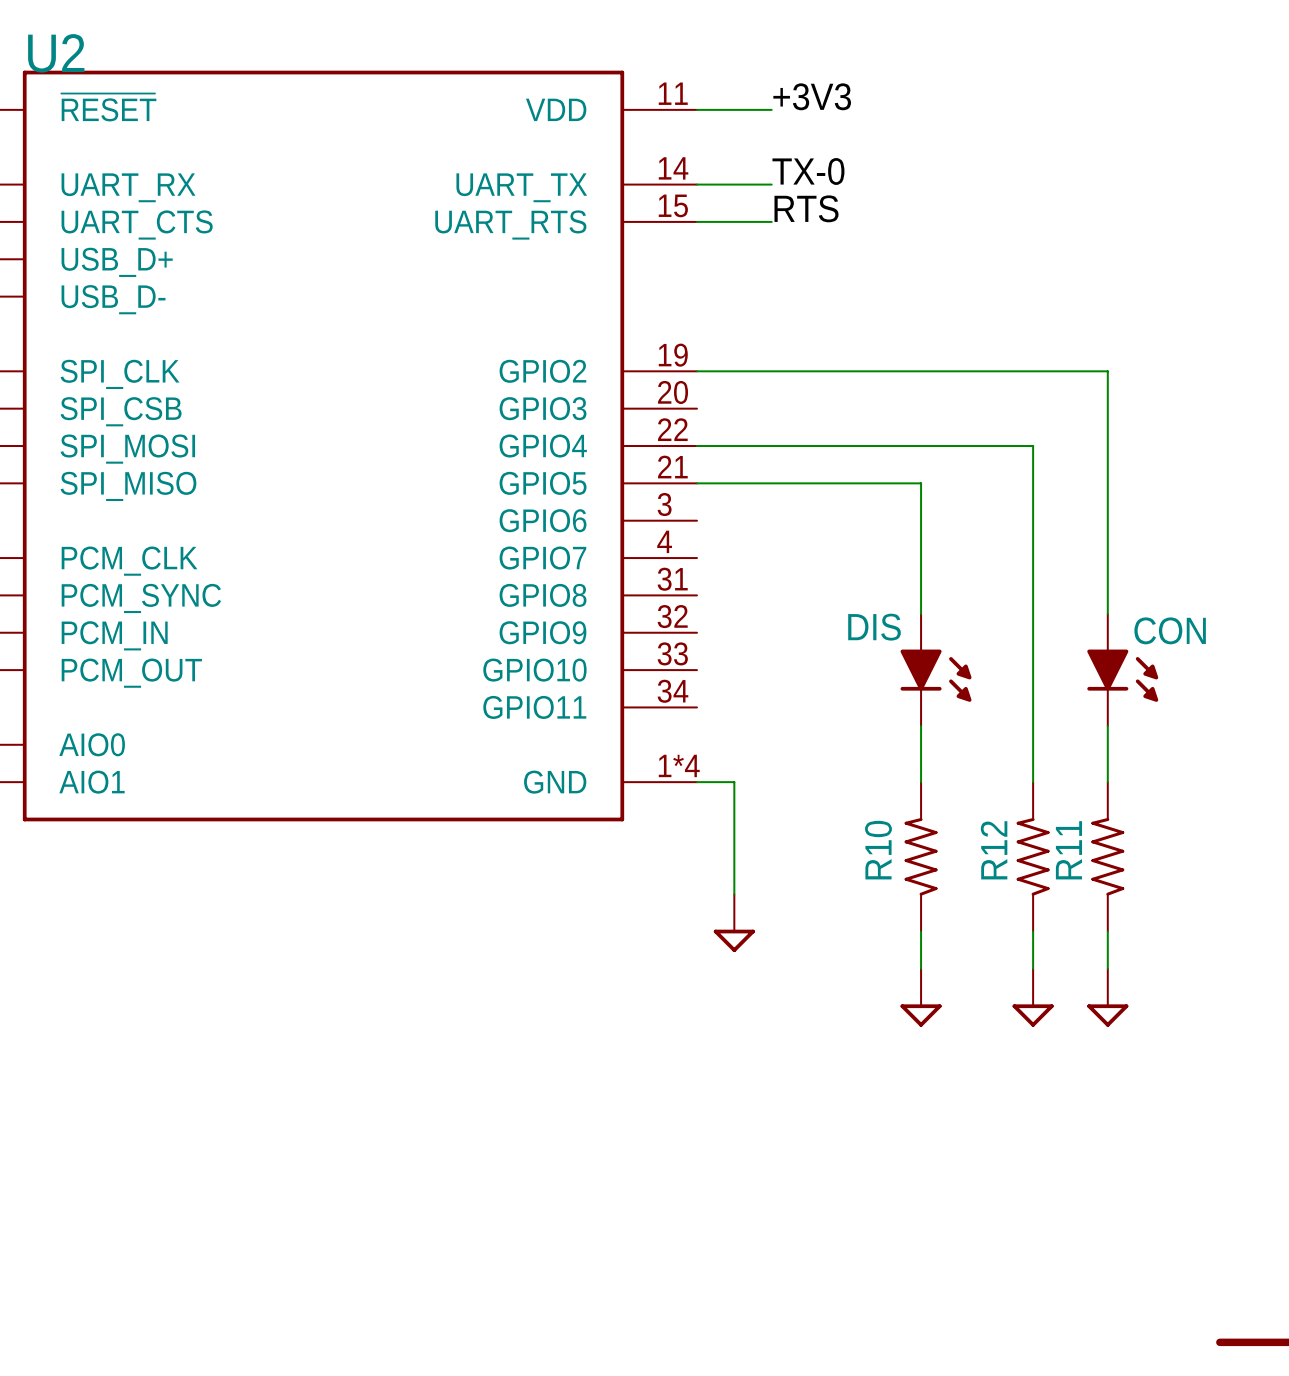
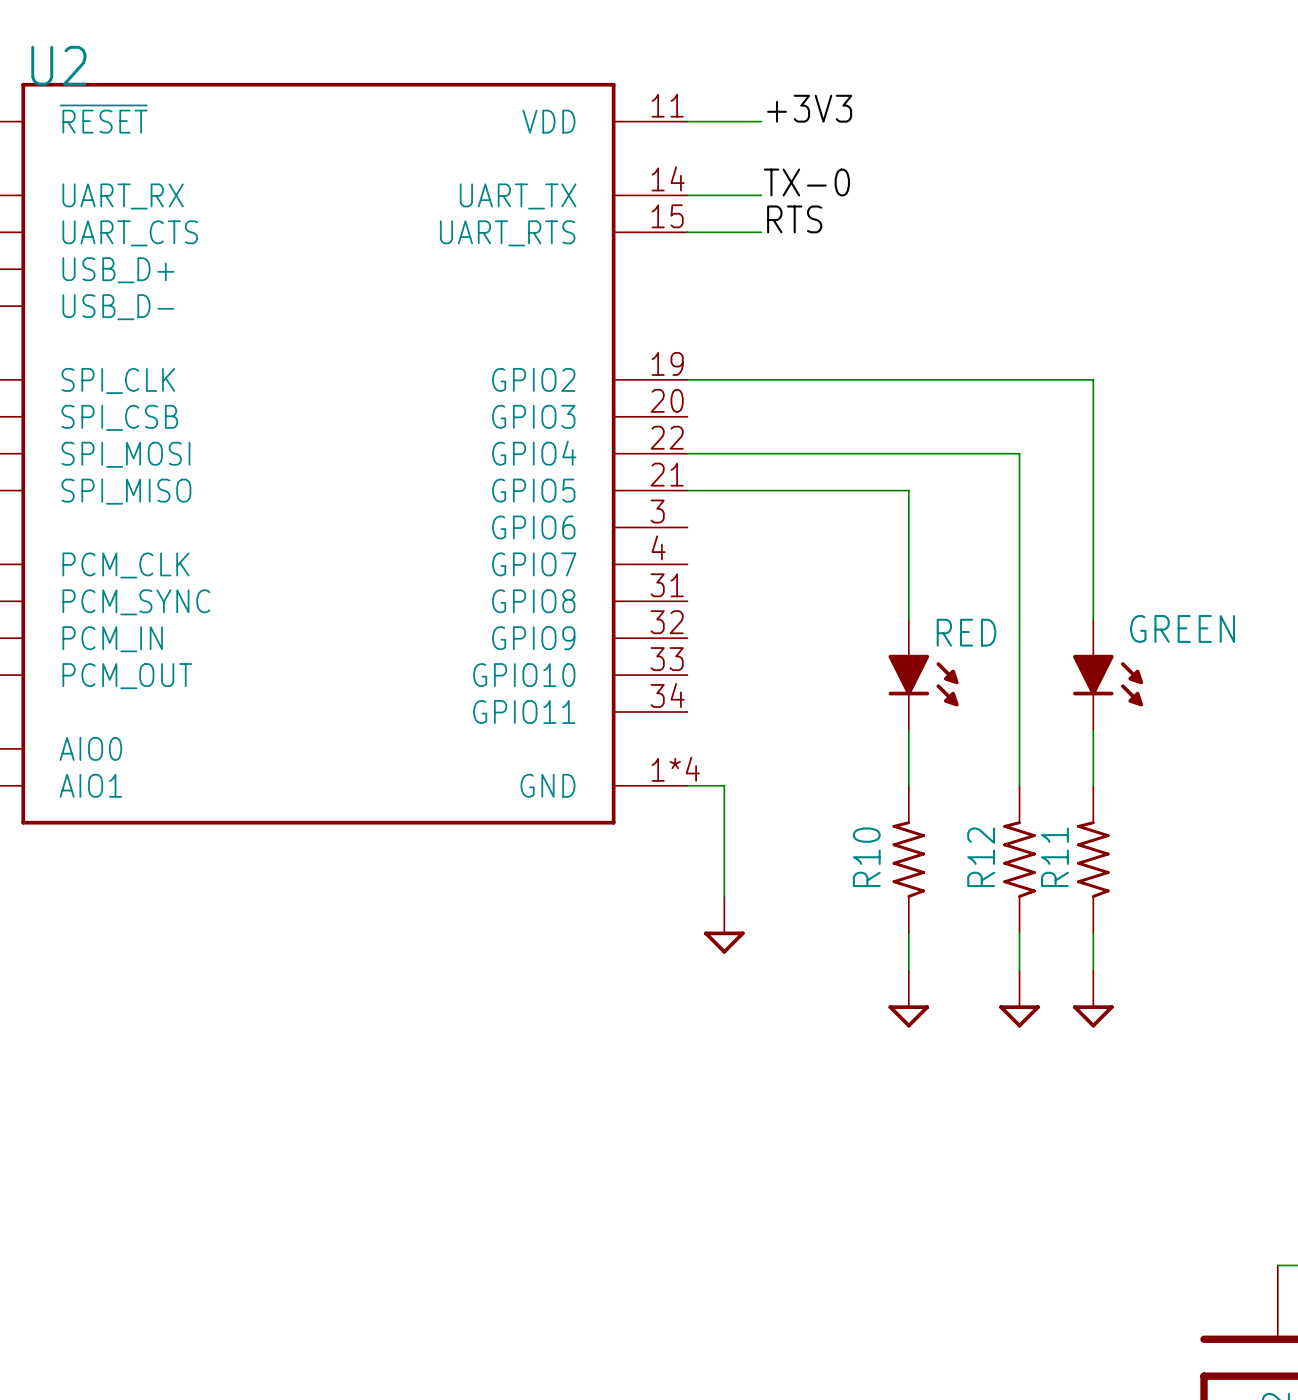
DIS name: DIS (874, 627) -> RED (966, 632)
CON name: CON (1170, 630) -> GREEN (1182, 628)

